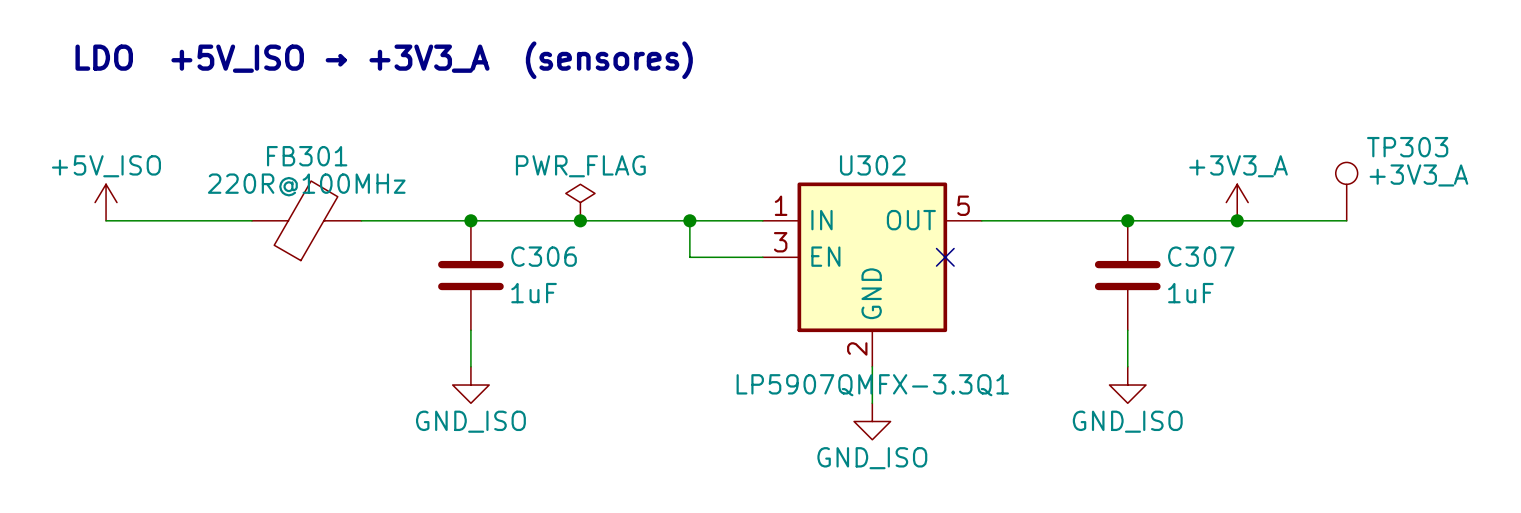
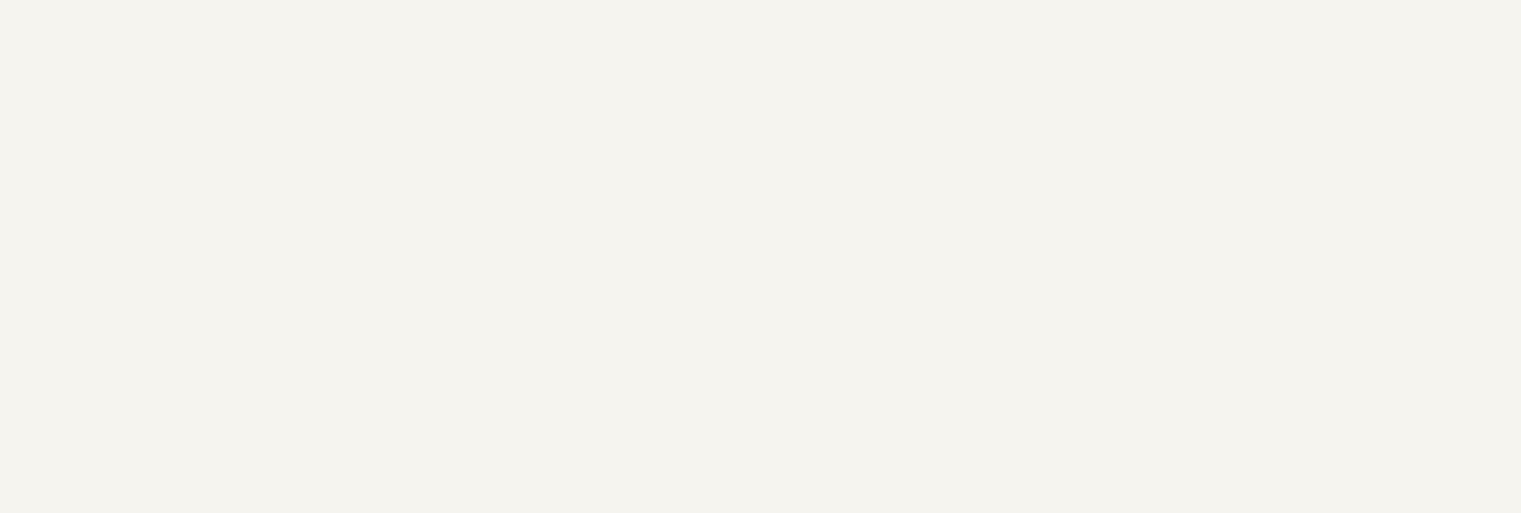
text: LDO +5V_ISO → +3V3_A (sensores) (384, 60) -> none
TP303: +3V3_A (1346, 191) -> none
power symbol: +5V_ISO (106, 202) -> none
power symbol: PWR_FLAG (580, 202) -> none
power symbol: +3V3_A (1237, 202) -> none
wire: (106, 220) (251, 220) -> none
FB301: 220R@100MHz (306, 220) -> none
wire: (361, 220) (762, 220) -> none
junction: (470, 220) -> none
junction: (580, 220) -> none
wire: (689, 220) (689, 257) (762, 257) -> none
junction: (689, 220) -> none
wire: (981, 220) (1346, 220) -> none
junction: (1127, 220) -> none
junction: (1237, 220) -> none
no-connect mark: (945, 257) -> none
U302: LP5907QMFX-3.3Q1 (872, 274) -> none
C306: 1uF (470, 275) -> none
C307: 1uF (1127, 275) -> none
wire: (470, 330) (470, 366) -> none
wire: (1127, 330) (1127, 366) -> none
wire: (872, 366) (872, 403) -> none
power symbol: GND_ISO (470, 385) -> none
power symbol: GND_ISO (1127, 385) -> none
power symbol: GND_ISO (872, 421) -> none

